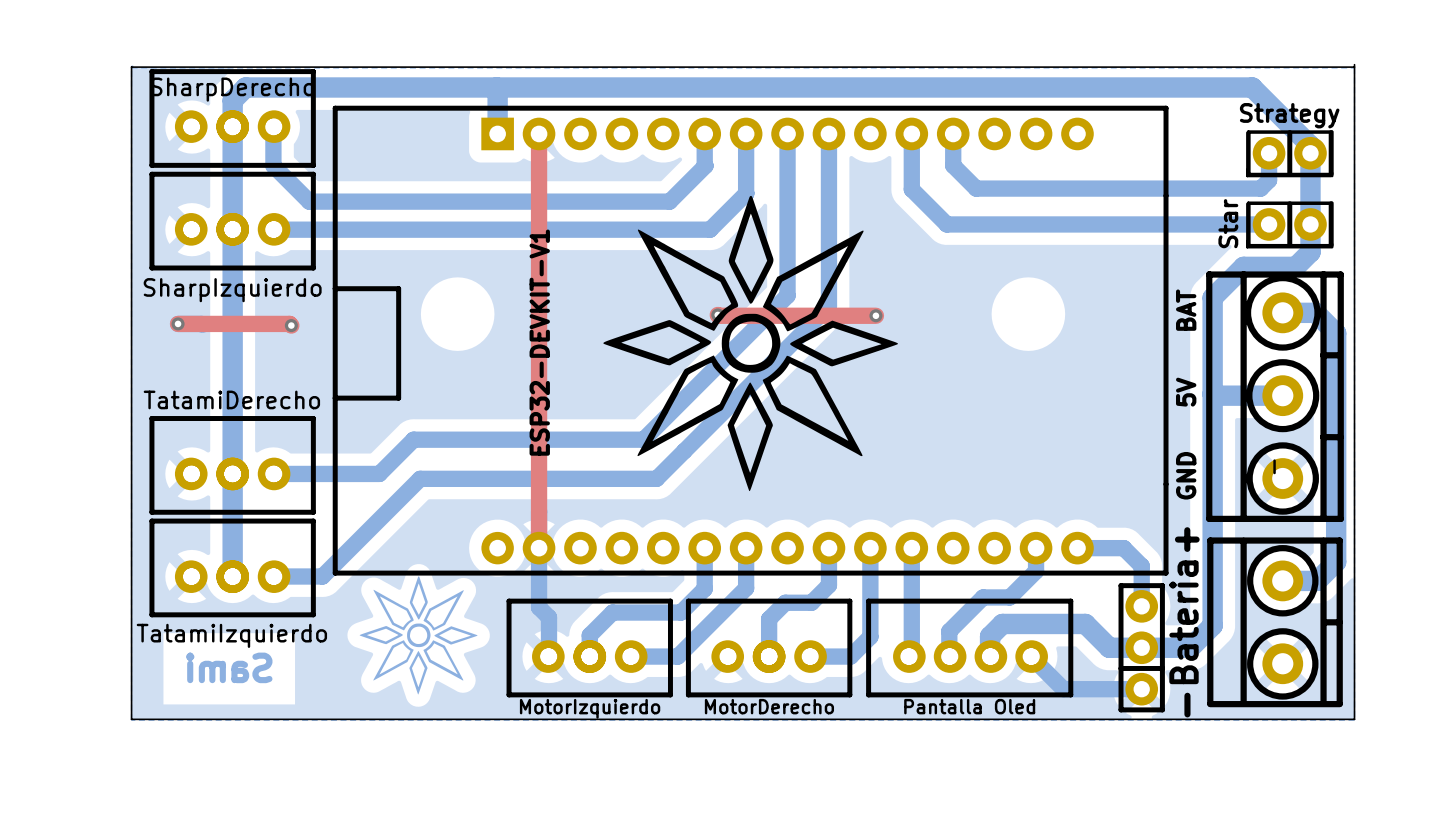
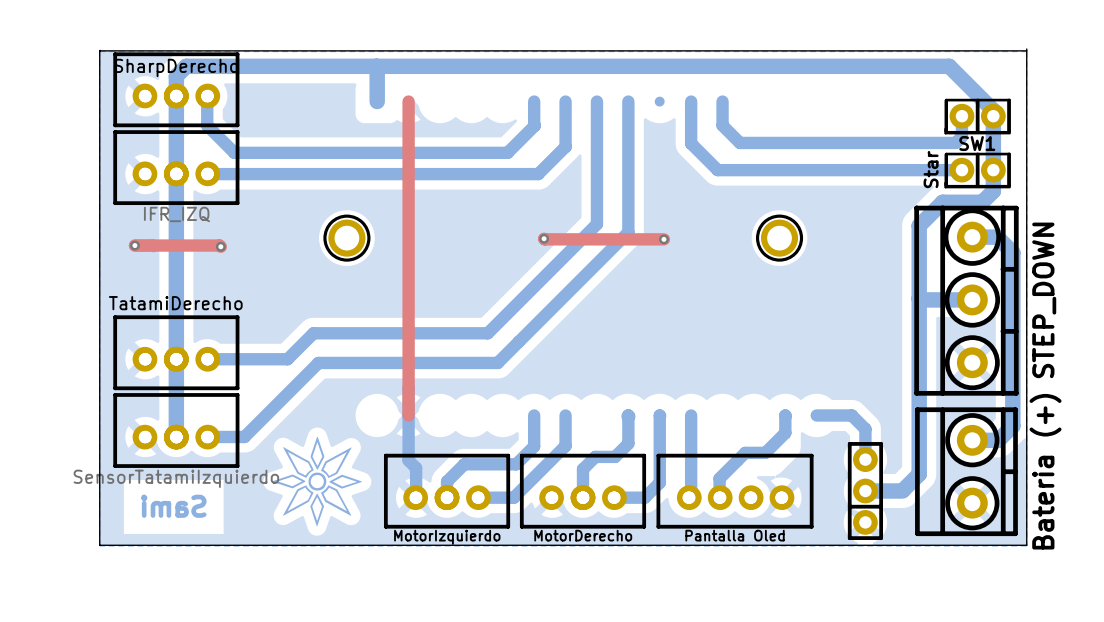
Strategy name: Strategy (1289, 115) -> SW1 (977, 143)
drawing: [603, 195, 898, 492] -> none
part value: SharpIzquierdo (232, 290) -> IFR_IZQ (176, 214)
text: BAT (1186, 310) -> none
part: none -> (346, 238)
part: none -> (779, 238)
part: ESP32-DEVKIT-V1 (750, 340) -> none
text: 5V (1186, 392) -> none
part value: none -> STEP_DOWN (1044, 300)
text: - (1274, 466) -> none
text: GND (1186, 475) -> none
text: + (1187, 539) -> none
part value: Bateria (1184, 622) -> Bateria (+) (1045, 471)
part value: TatamiIzquierdo (231, 635) -> SensorTatamiIzquierdo (176, 478)
bottom track: (1141, 647) (1109, 647) (1085, 623) (1002, 623) (990, 636) (990, 656) -> none
bottom track: (1030, 656) (1063, 689) (1141, 689) -> none
text: - (1187, 705) -> none

